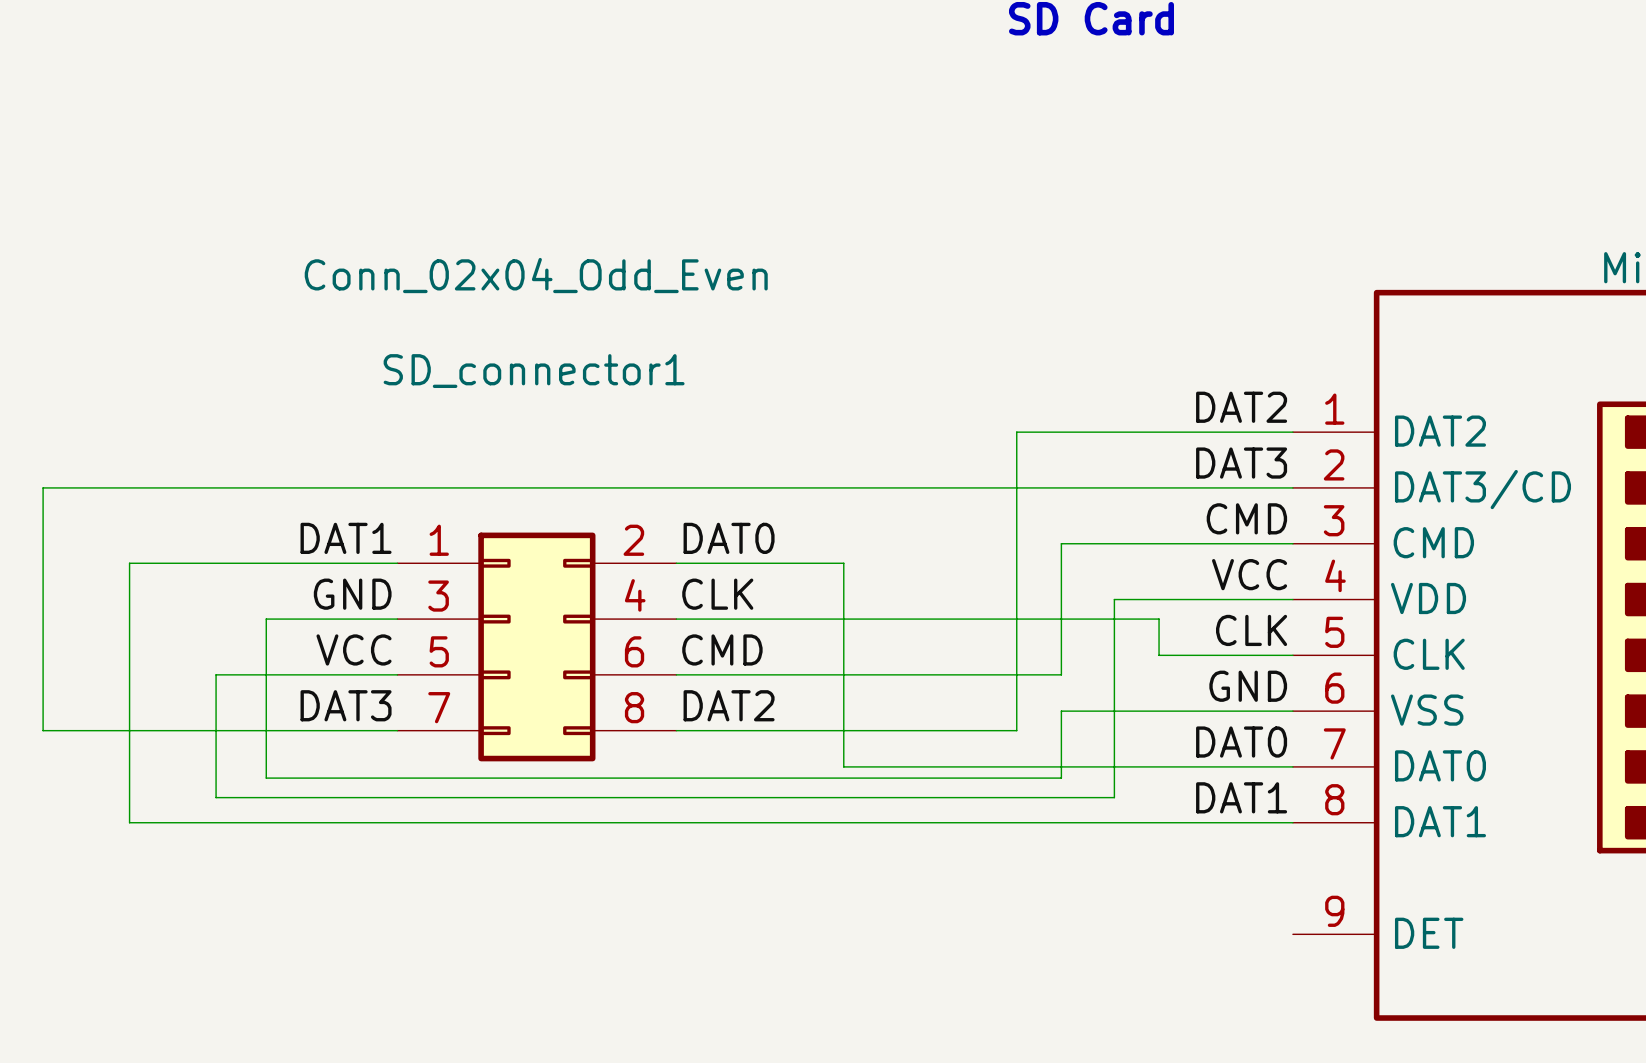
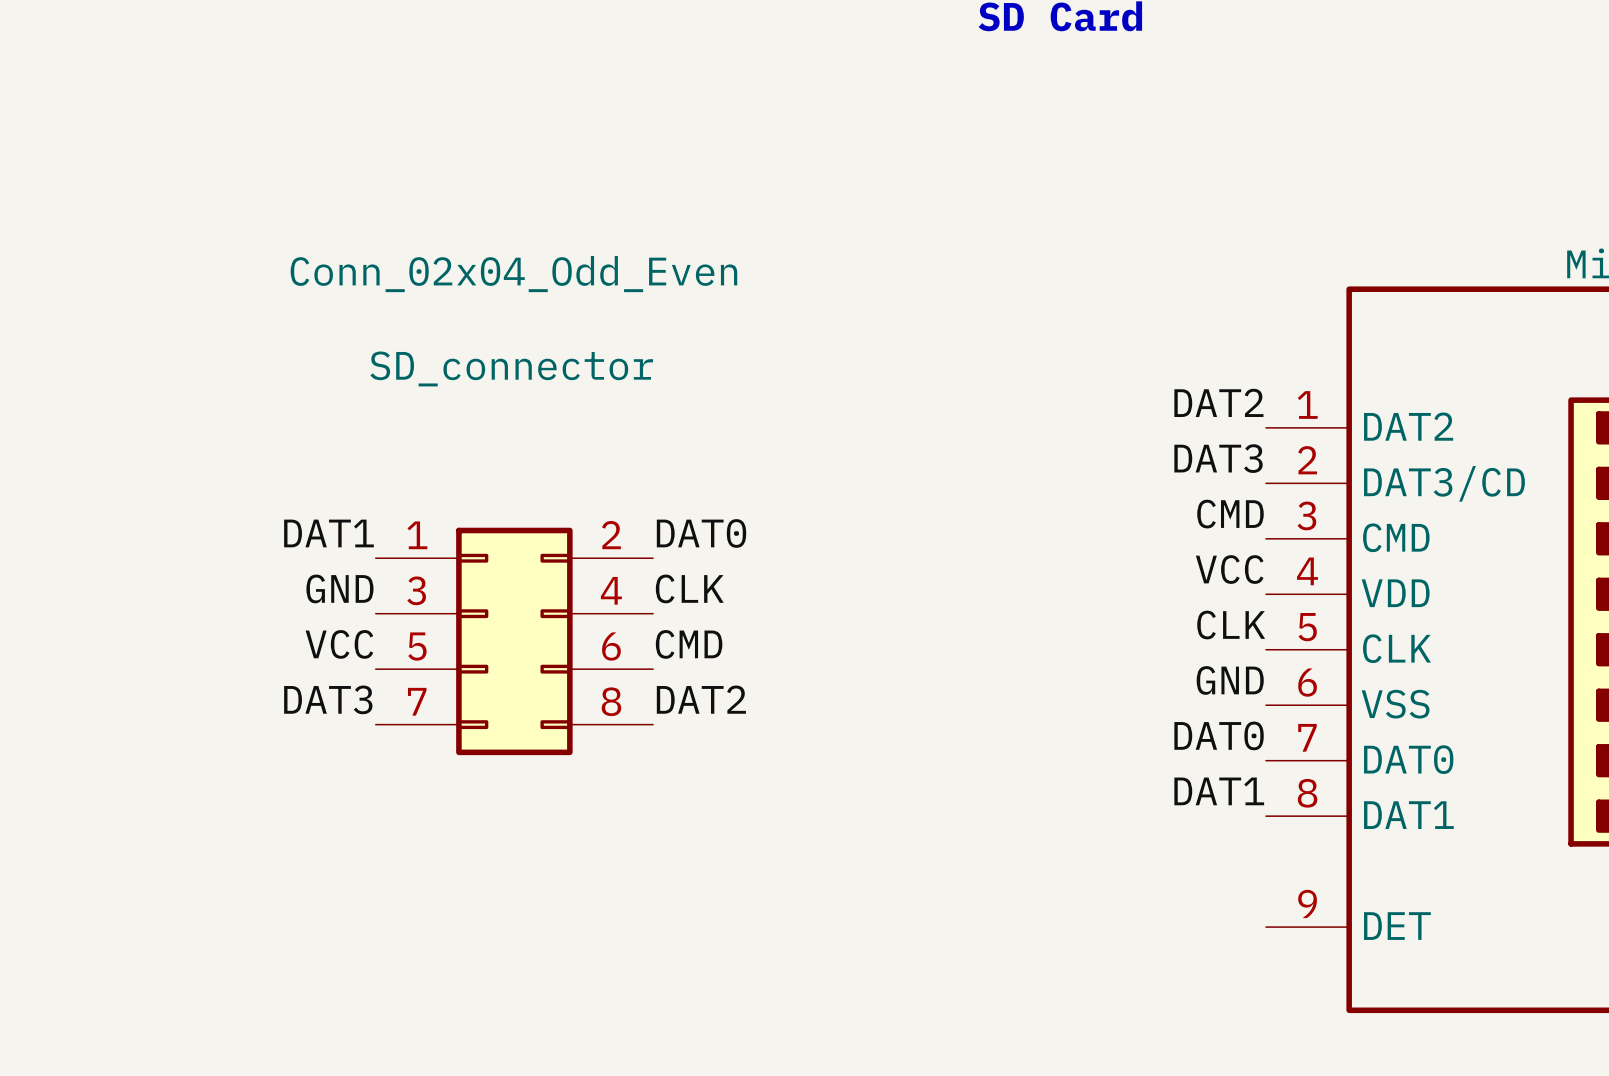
SD_connector1 name: SD_connector1 (534, 371) -> SD_connector (511, 368)
wire: (1292, 432) (1016, 432) (1016, 730) (676, 730) -> none
wire: (1292, 487) (43, 487) (43, 730) (397, 730) -> none
wire: (1292, 543) (1061, 543) (1061, 674) (676, 674) -> none
wire: (397, 563) (129, 563) (129, 822) (1292, 822) -> none
wire: (676, 563) (843, 563) (843, 766) (1292, 766) -> none
wire: (1292, 599) (1114, 599) (1114, 797) (216, 797) (216, 674) (397, 674) -> none
wire: (397, 619) (266, 619) (266, 778) (1061, 778) (1061, 711) (1292, 711) -> none
wire: (676, 619) (1159, 619) (1159, 655) (1292, 655) -> none

